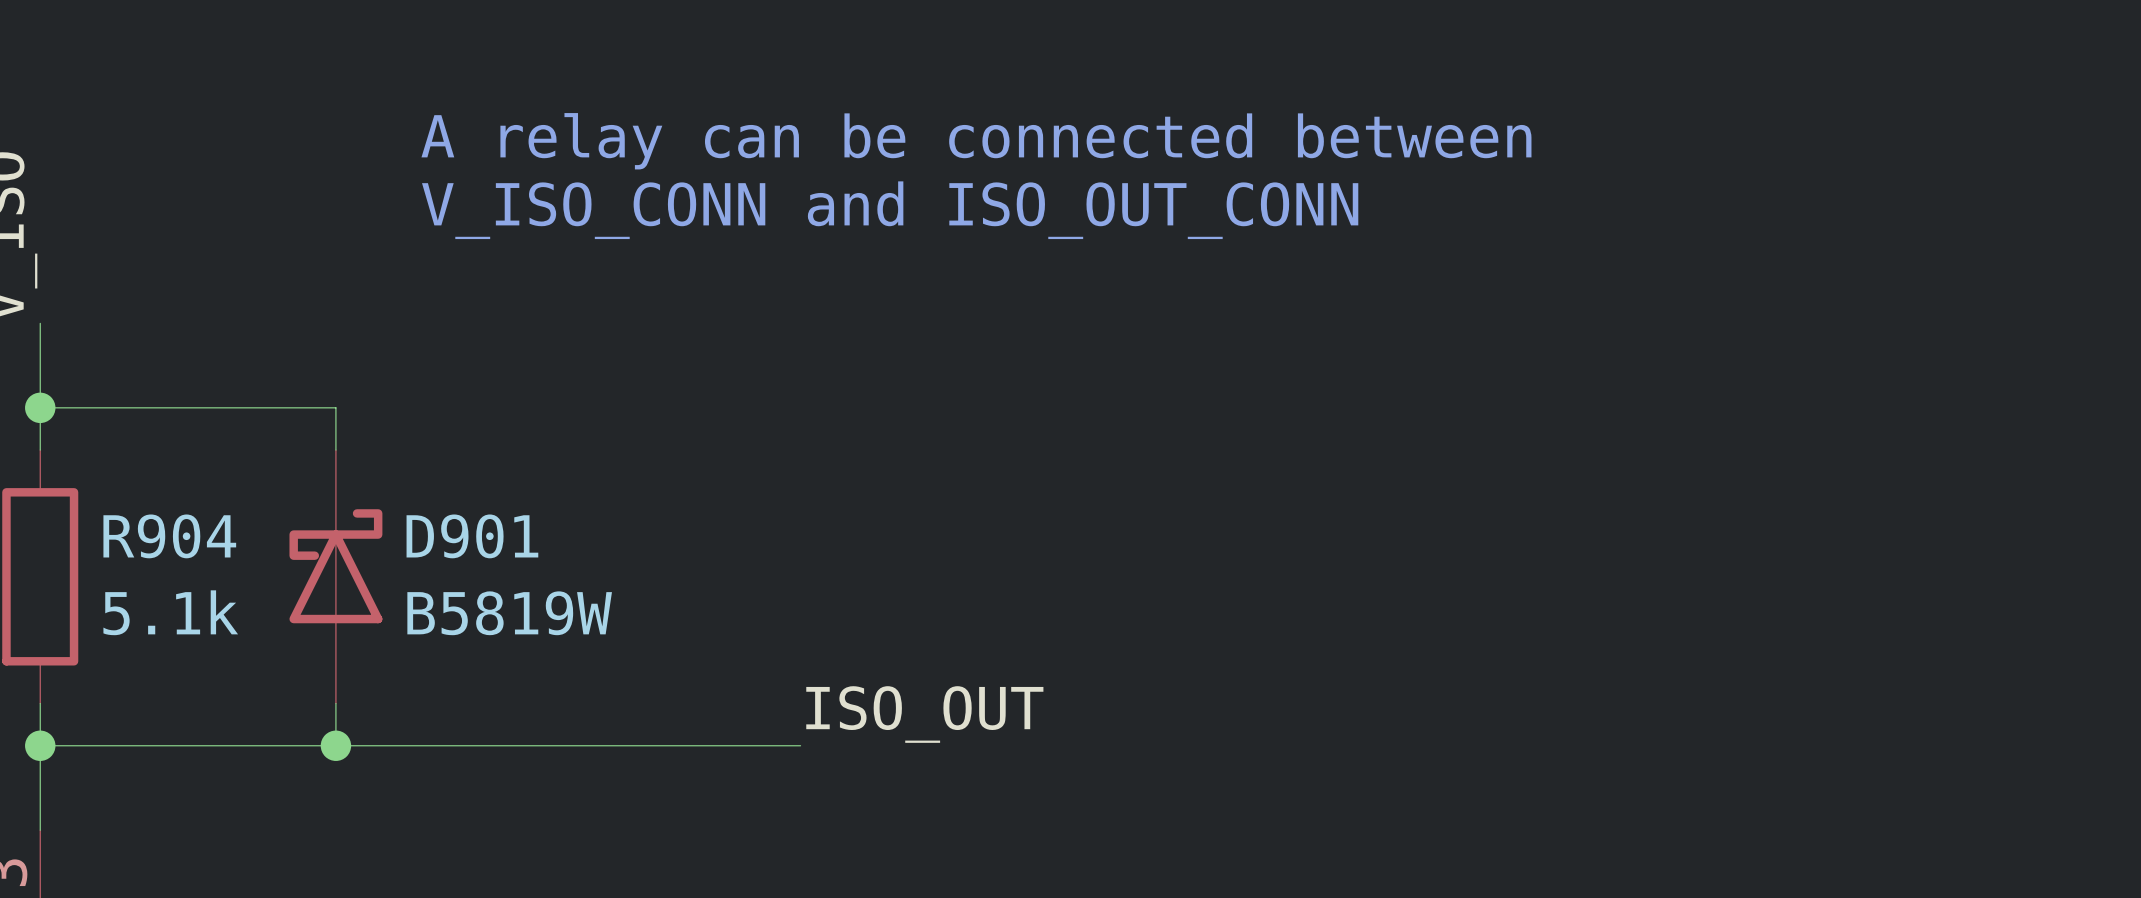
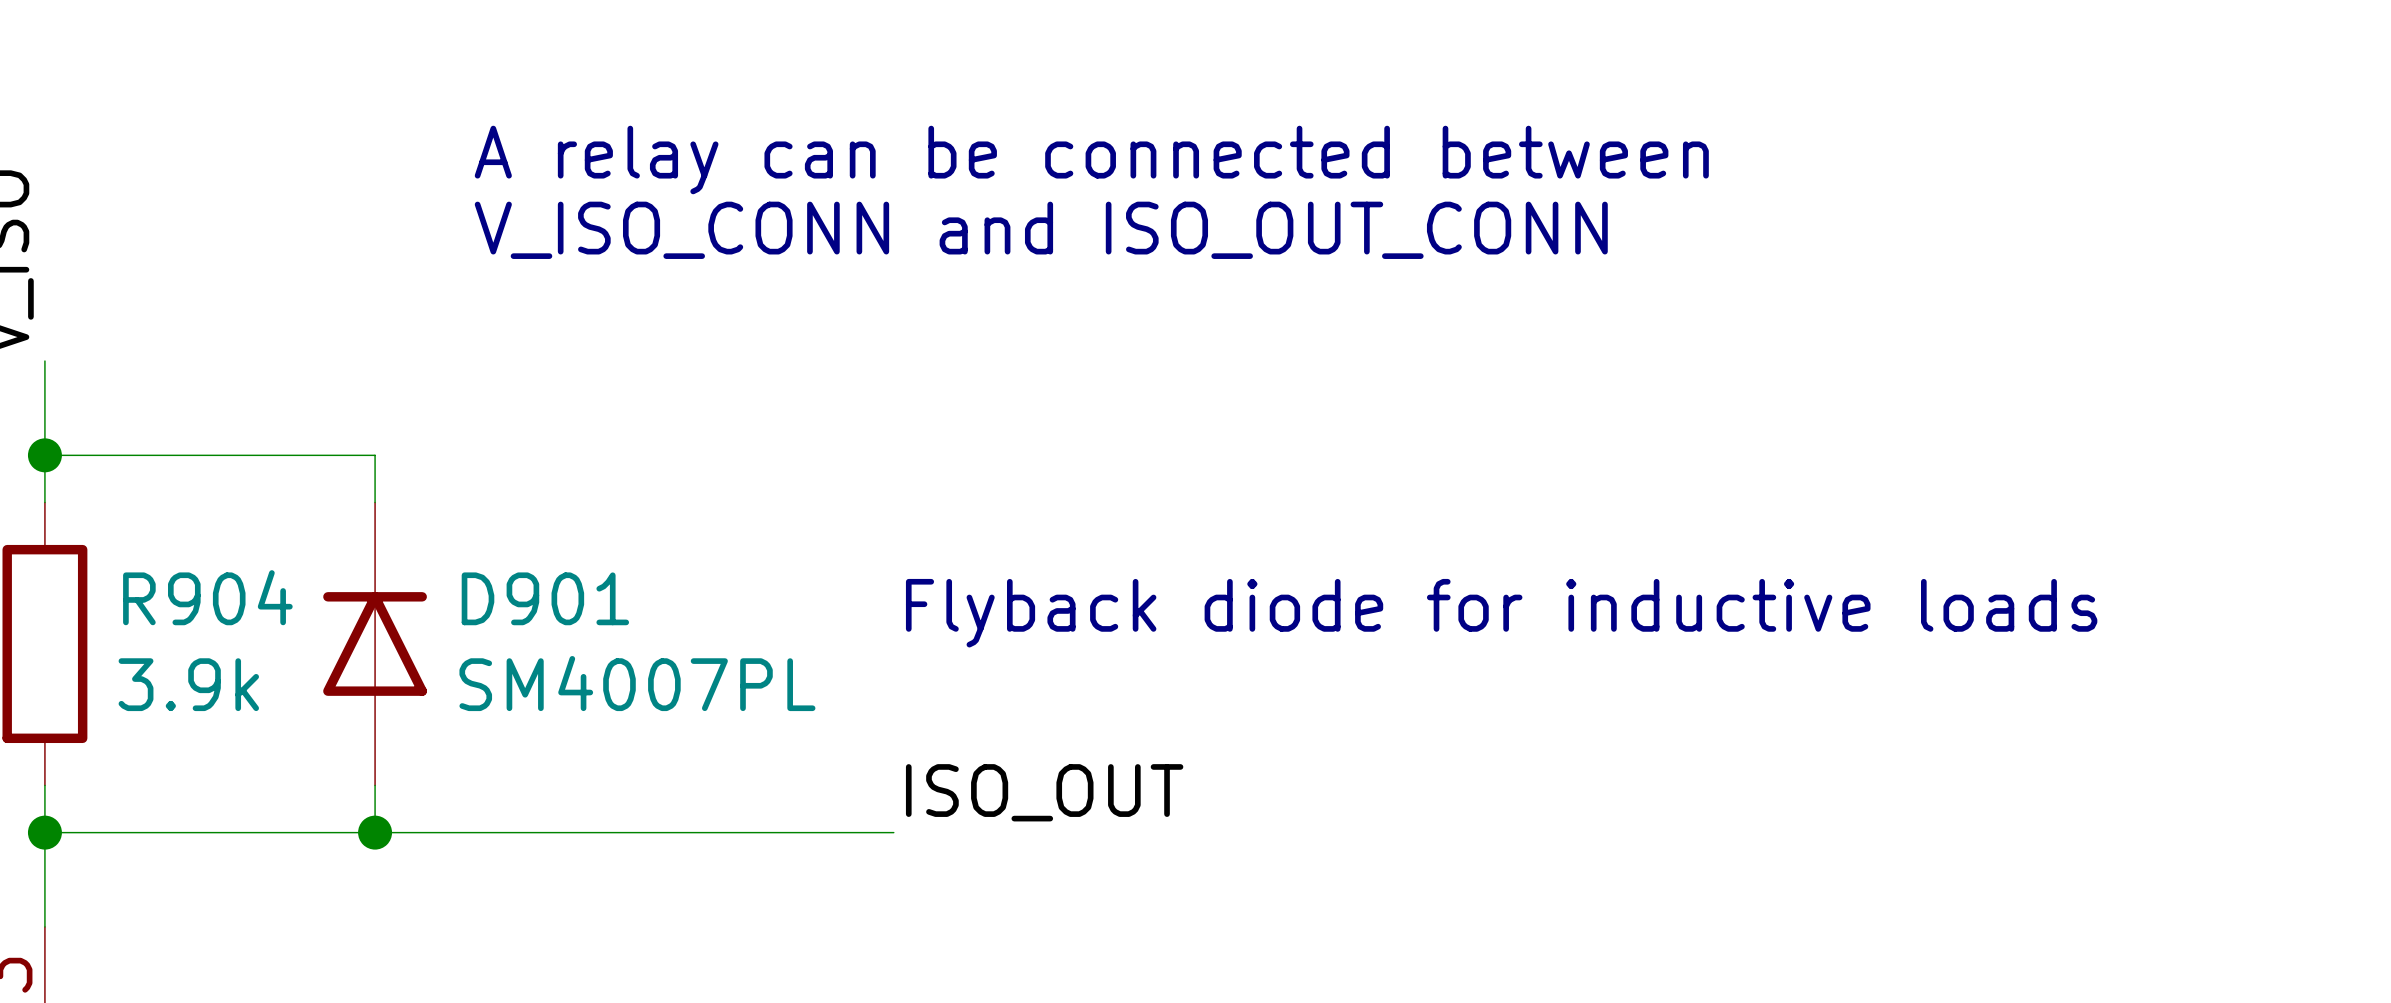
D901 symbol: [289, 450, 383, 704] -> [323, 502, 427, 786]
text: none -> Flyback diode for inductive loads (1501, 613)
R904 value: 5.1k (170, 612) -> 3.9k (188, 684)
D901 value: B5819W (509, 613) -> SM4007PL (637, 683)

